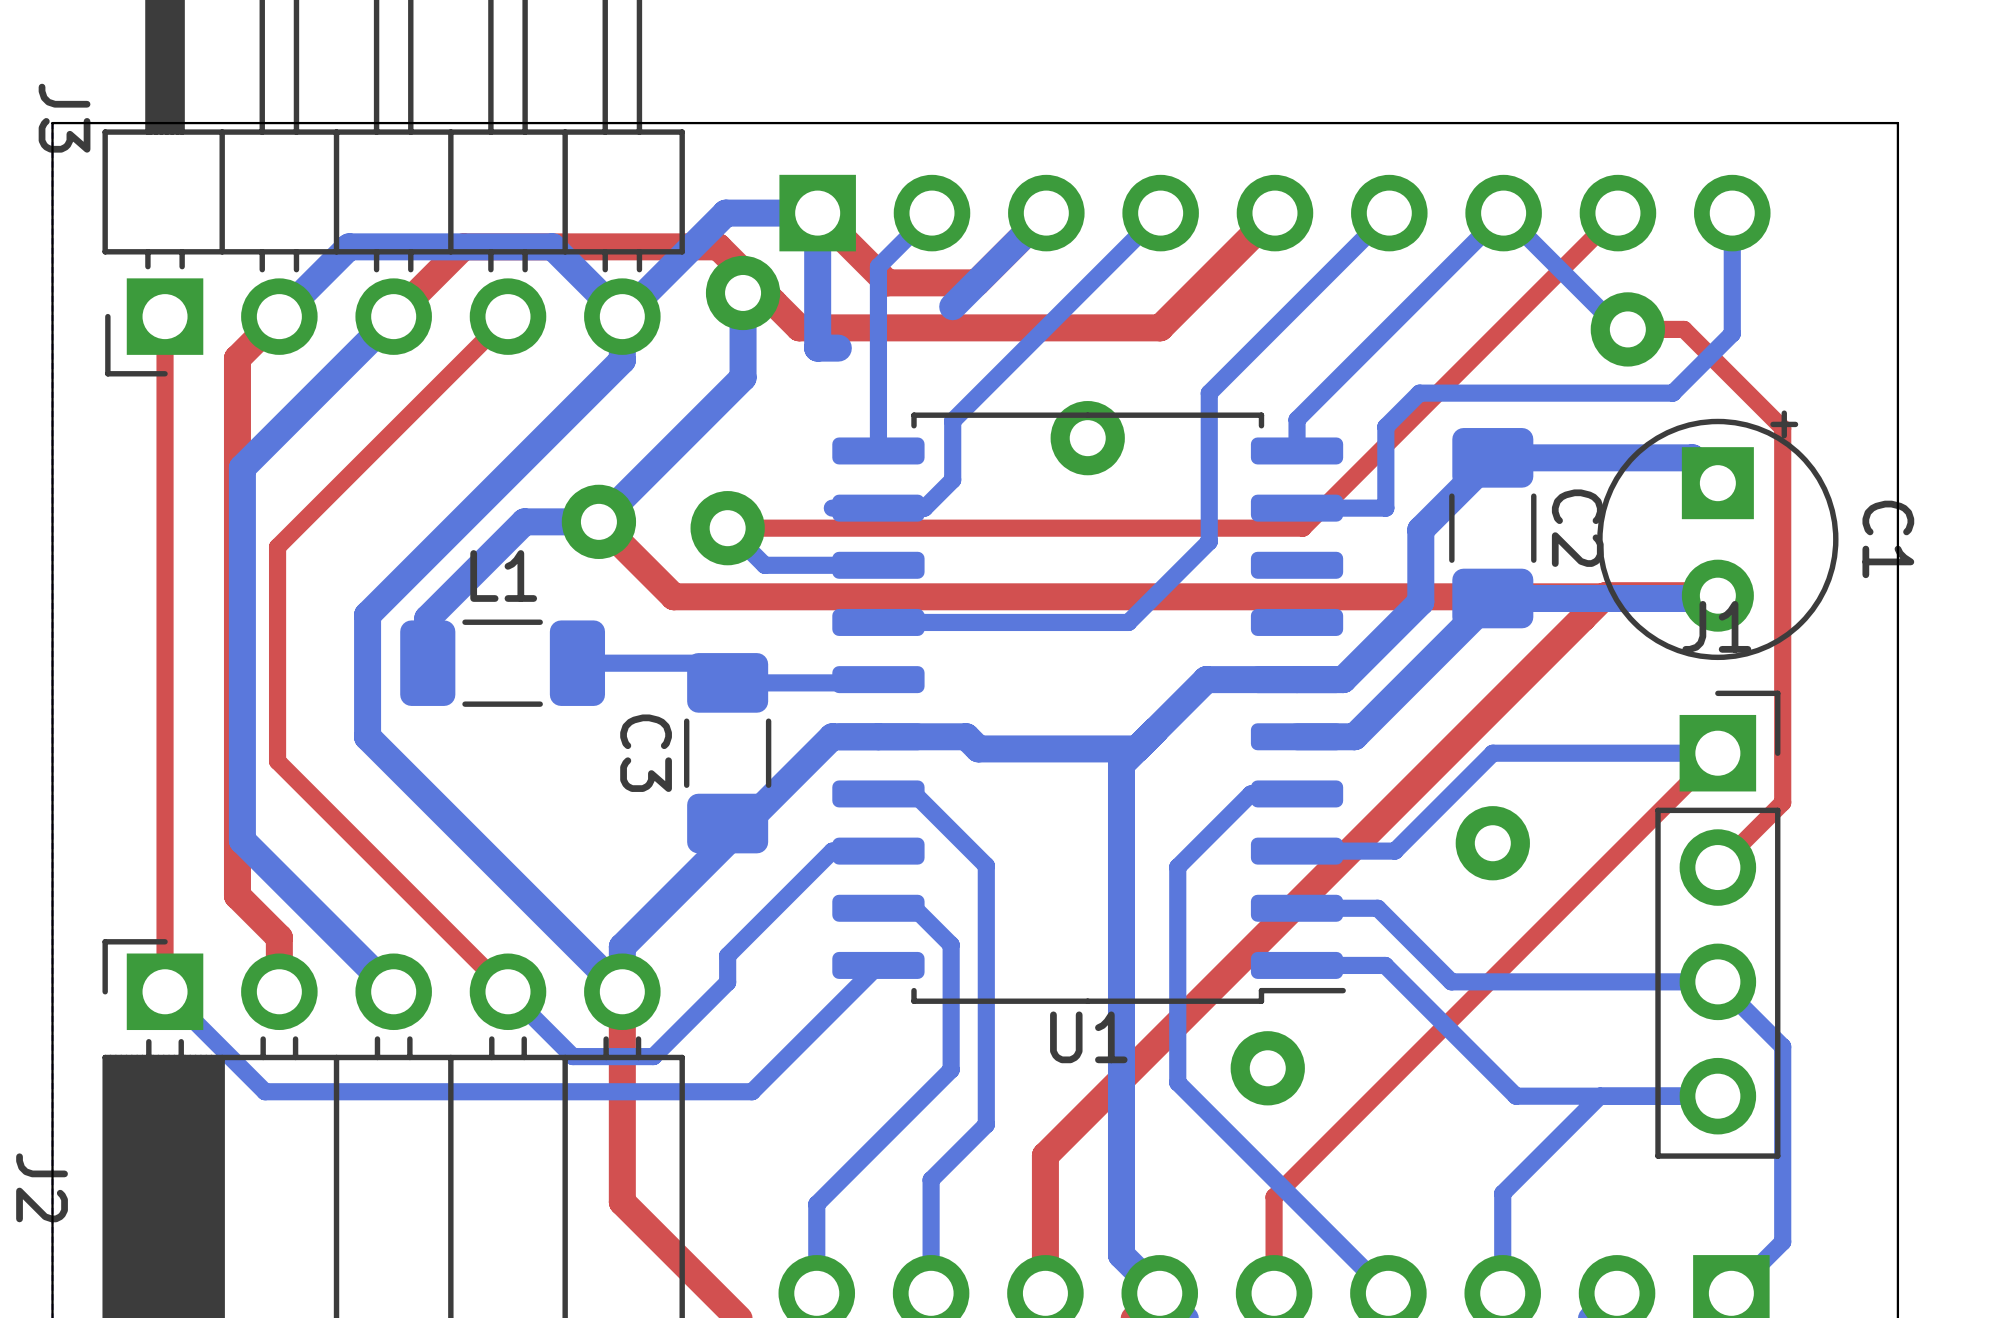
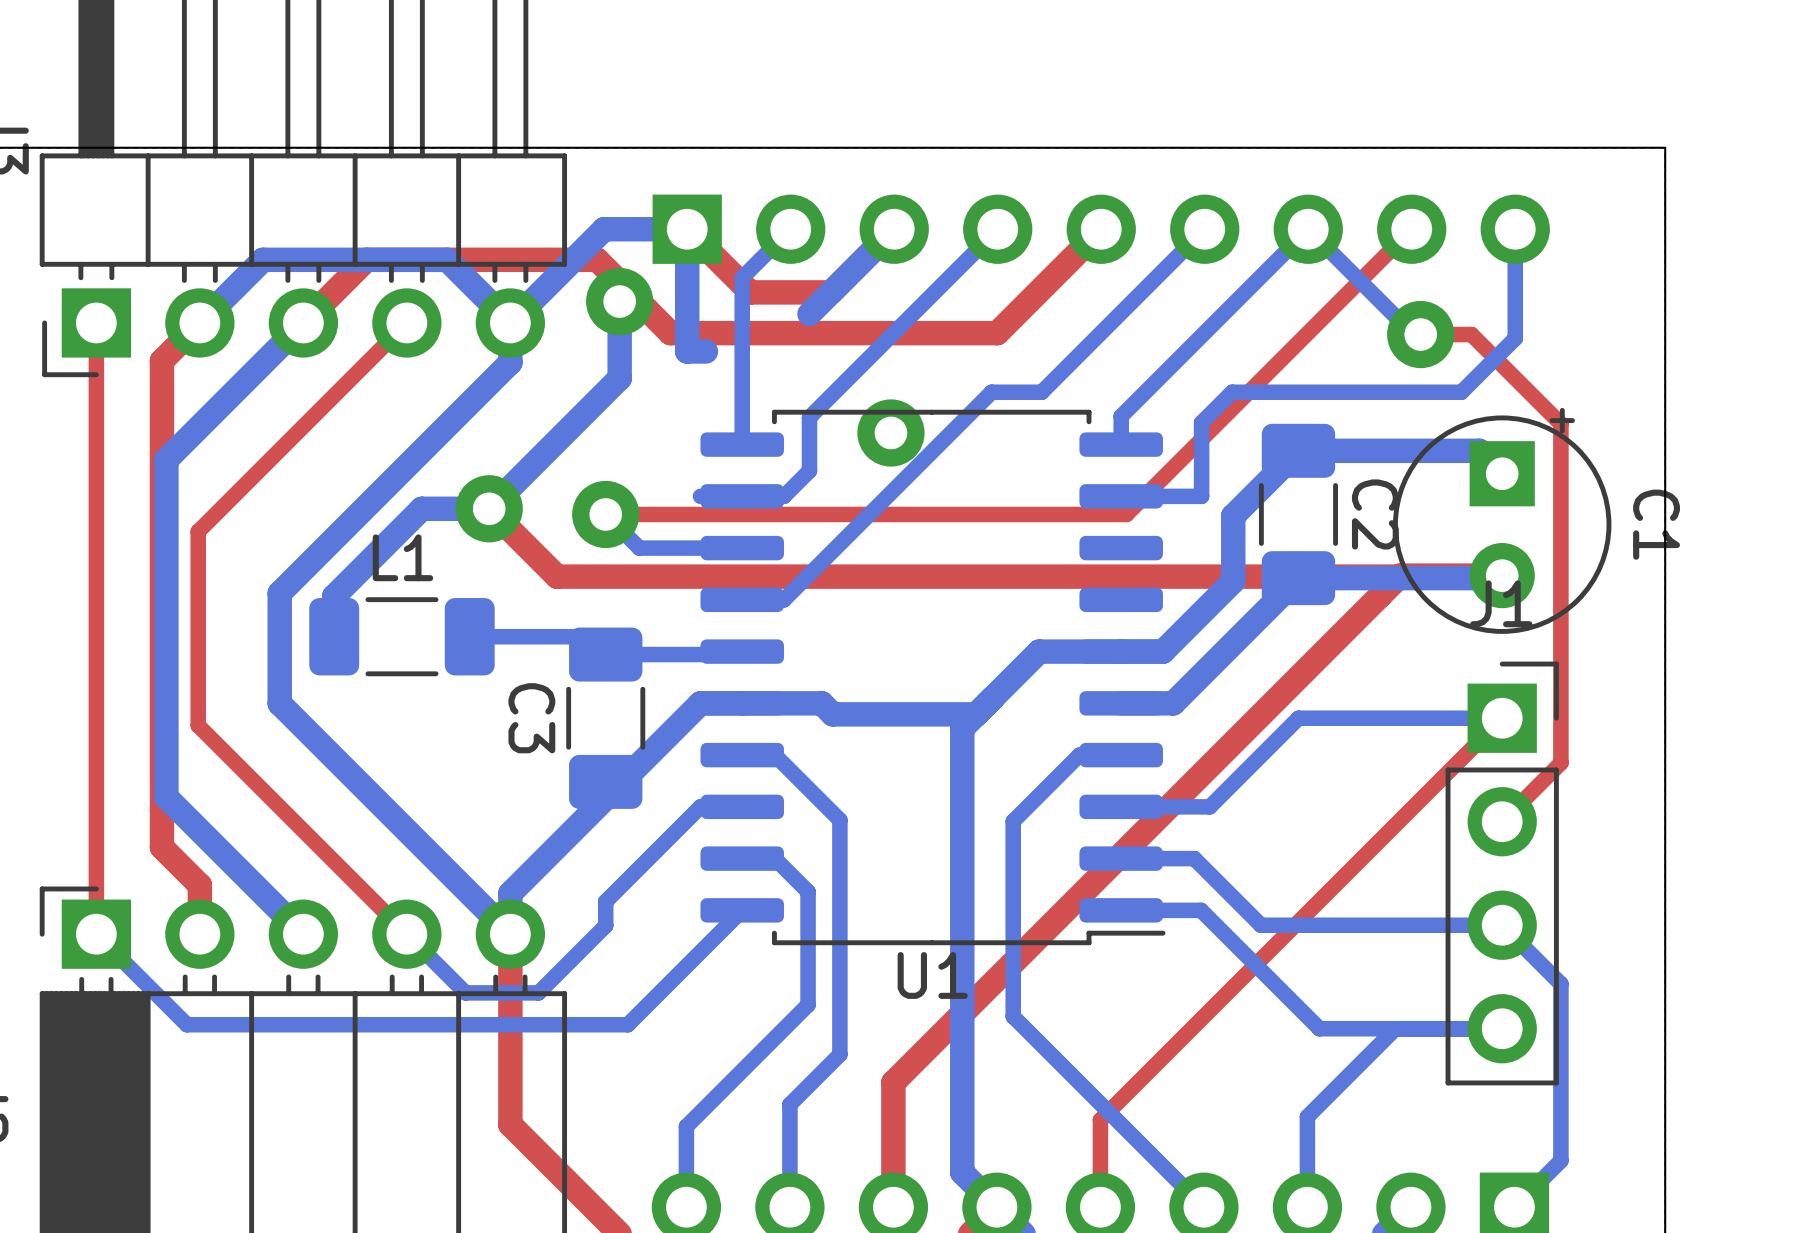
bottom track: (1209, 393) (1209, 541) (1128, 622) (924, 622) -> (1041, 392) (991, 392) (784, 599)
via position: (1087, 438) -> (890, 432)
via: (1492, 843) -> none
via: (1267, 1068) -> none

